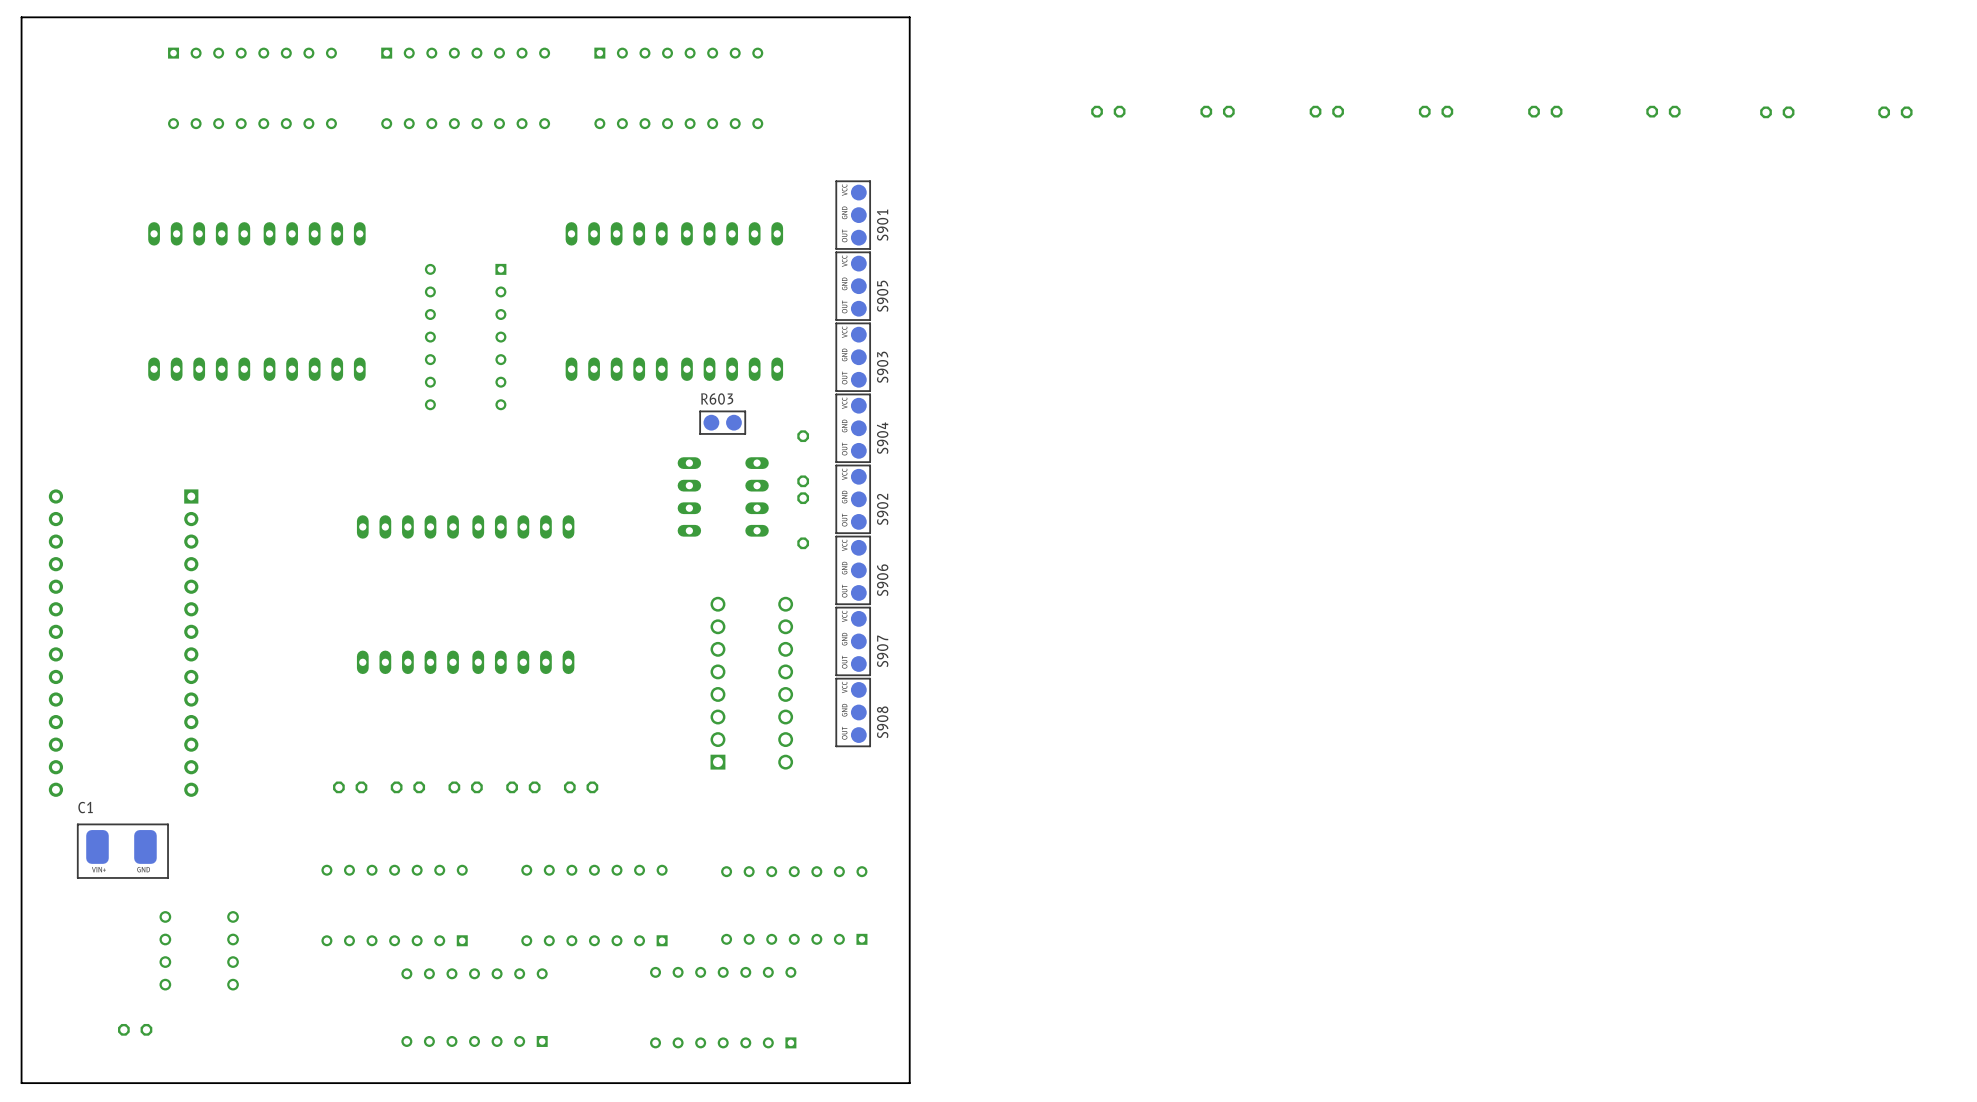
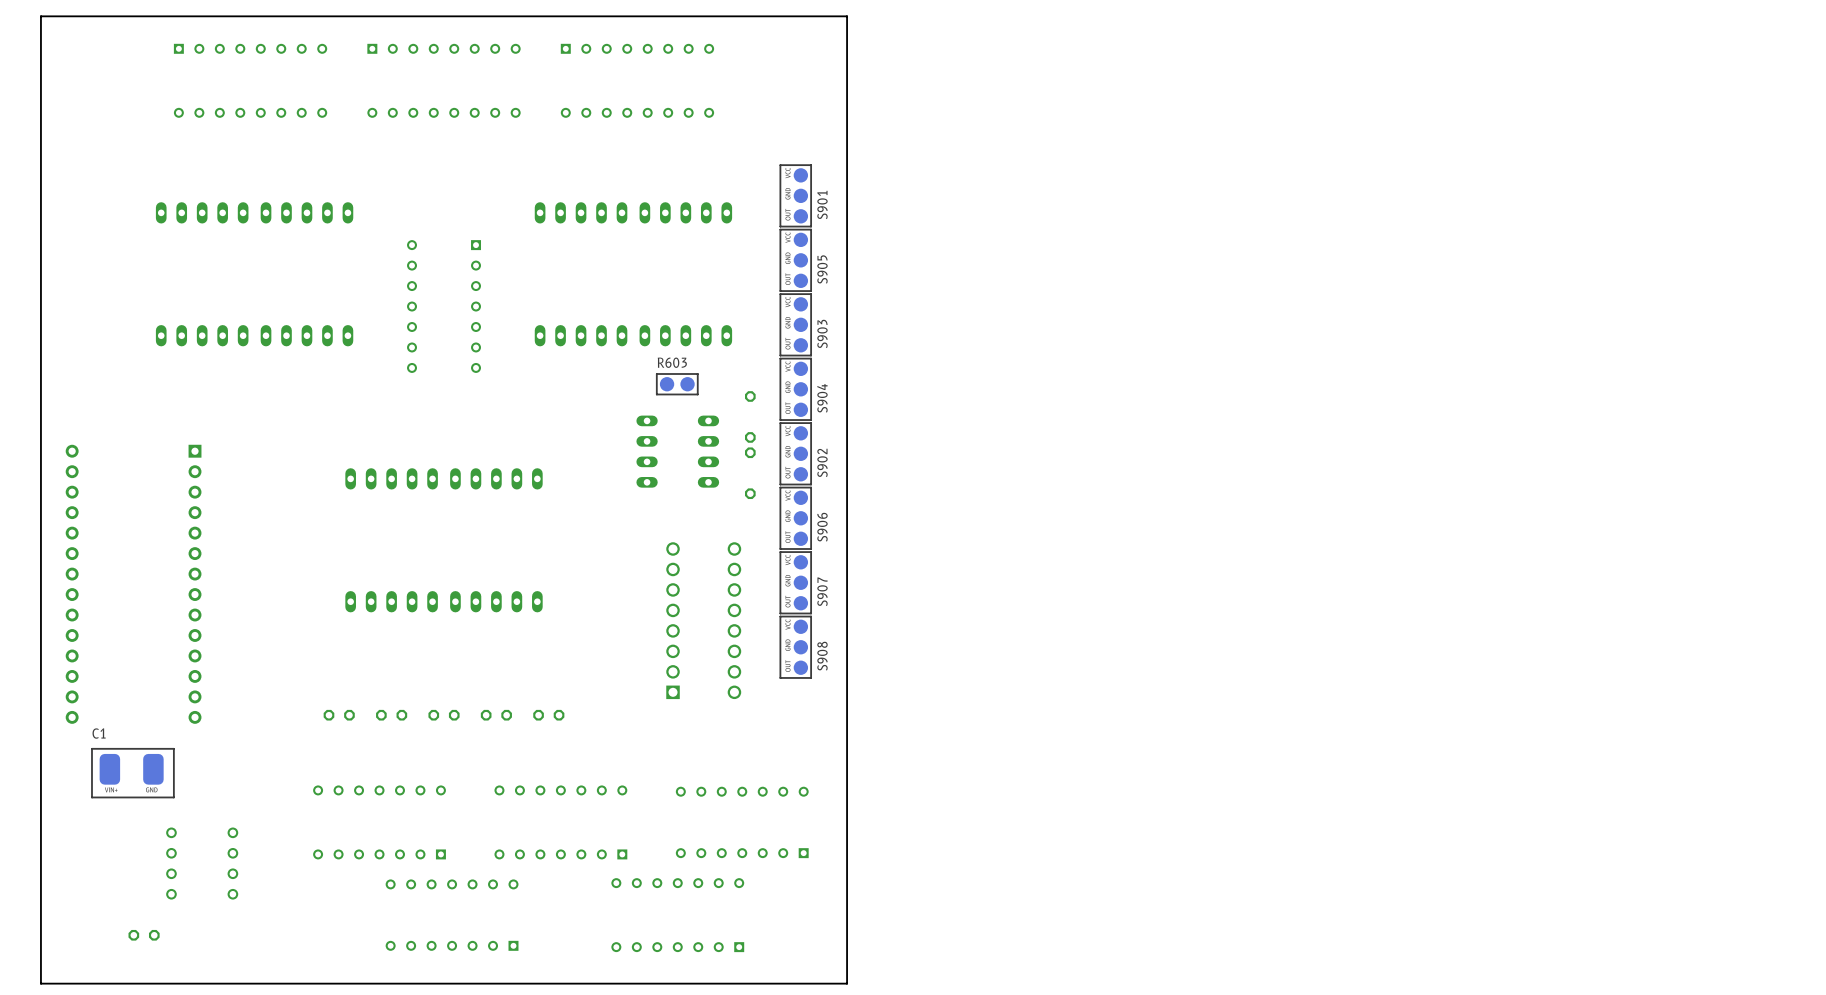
part: (1108, 111) -> none
part: (1217, 111) -> none
part: (1326, 111) -> none
part: (1436, 111) -> none
part: (1545, 111) -> none
part: (1663, 111) -> none
part: (1777, 112) -> none
part: (1895, 112) -> none

